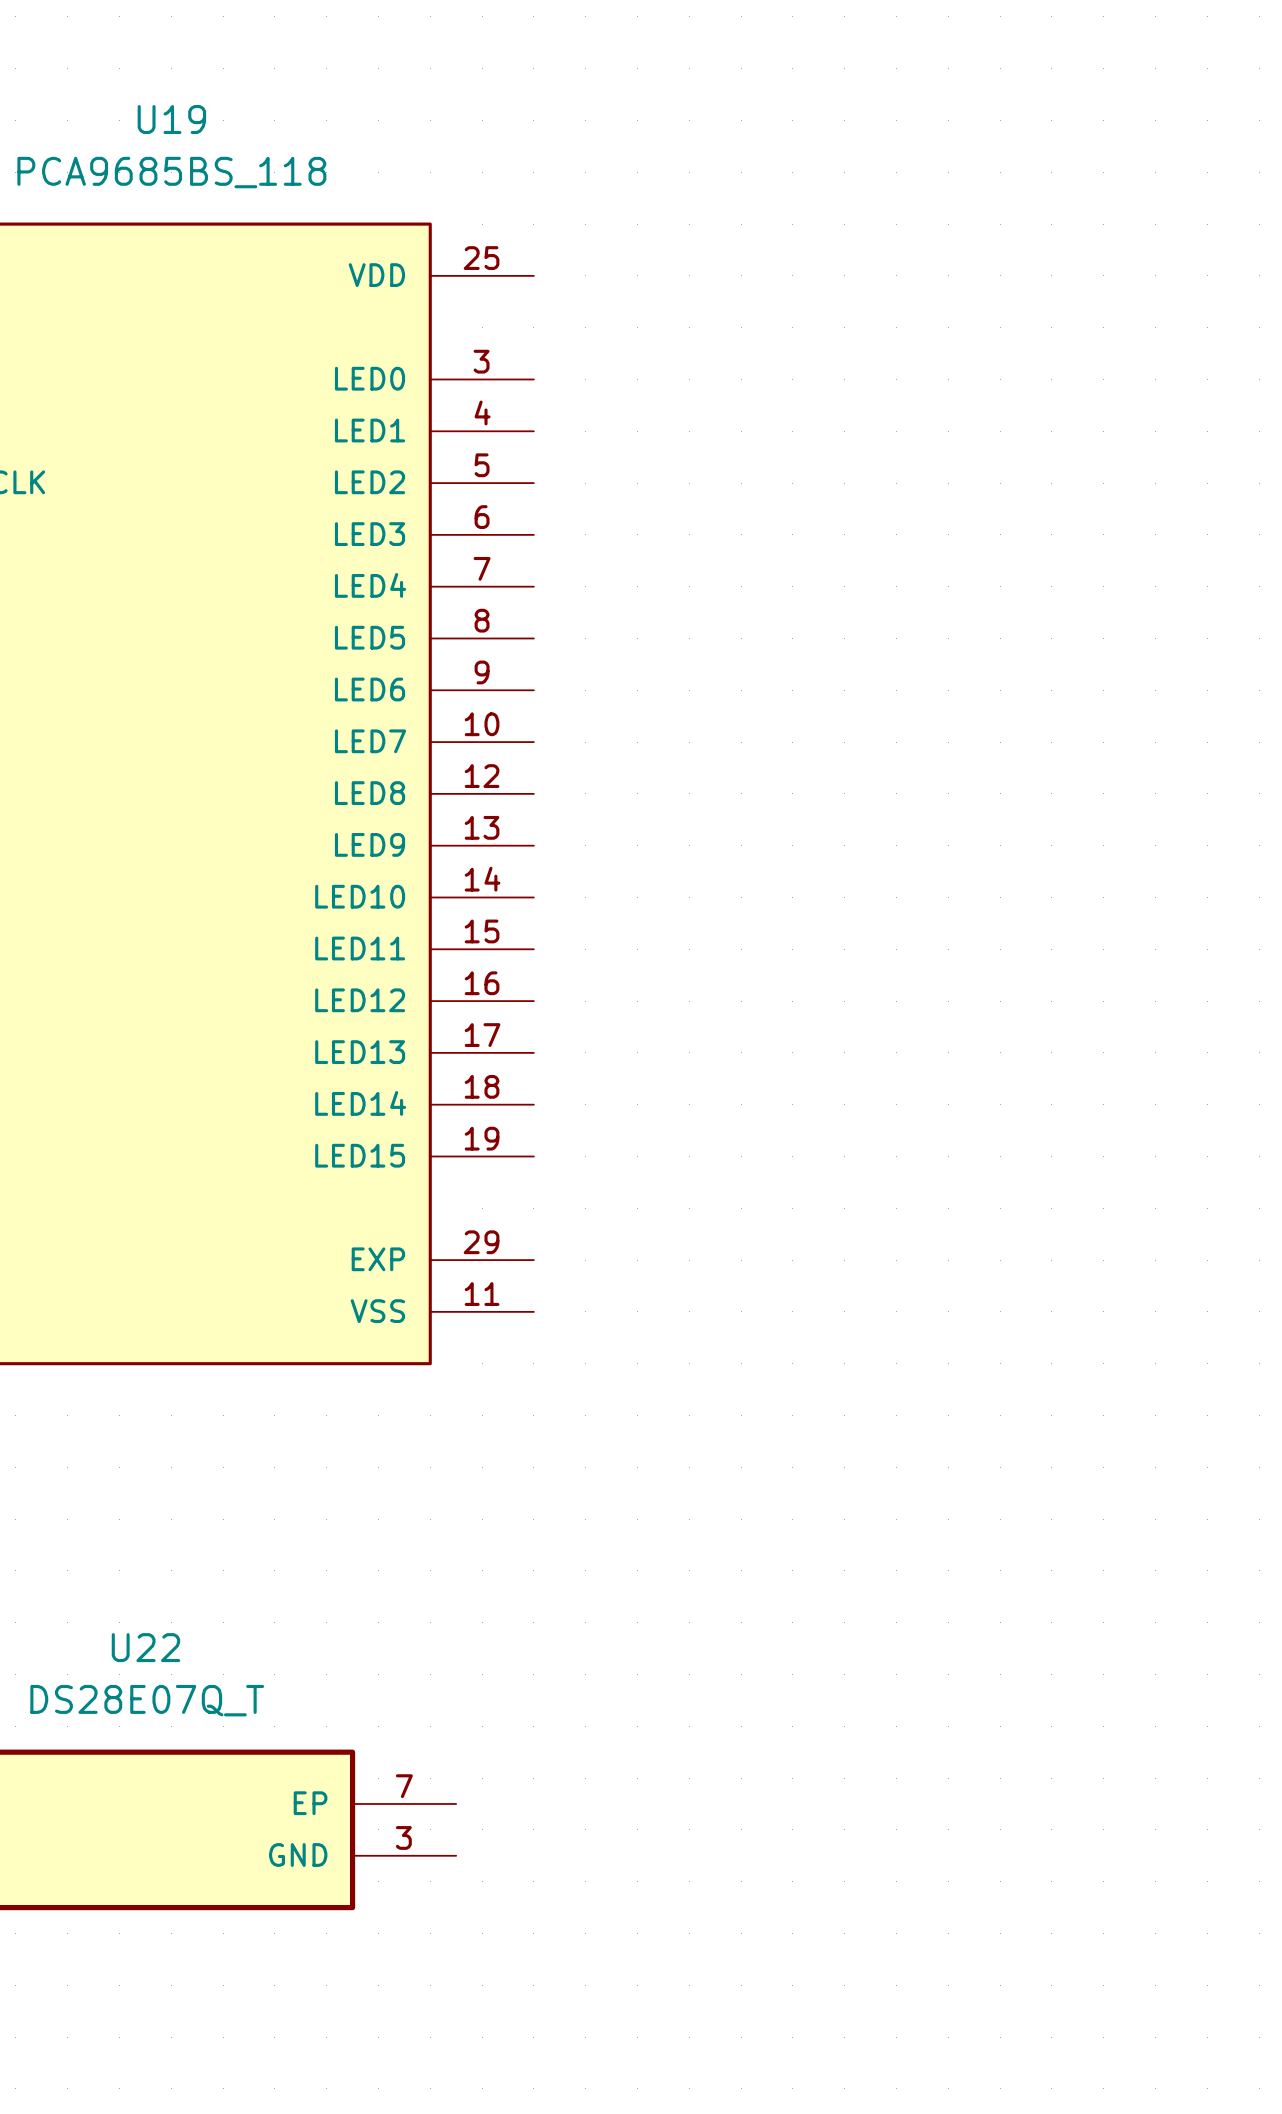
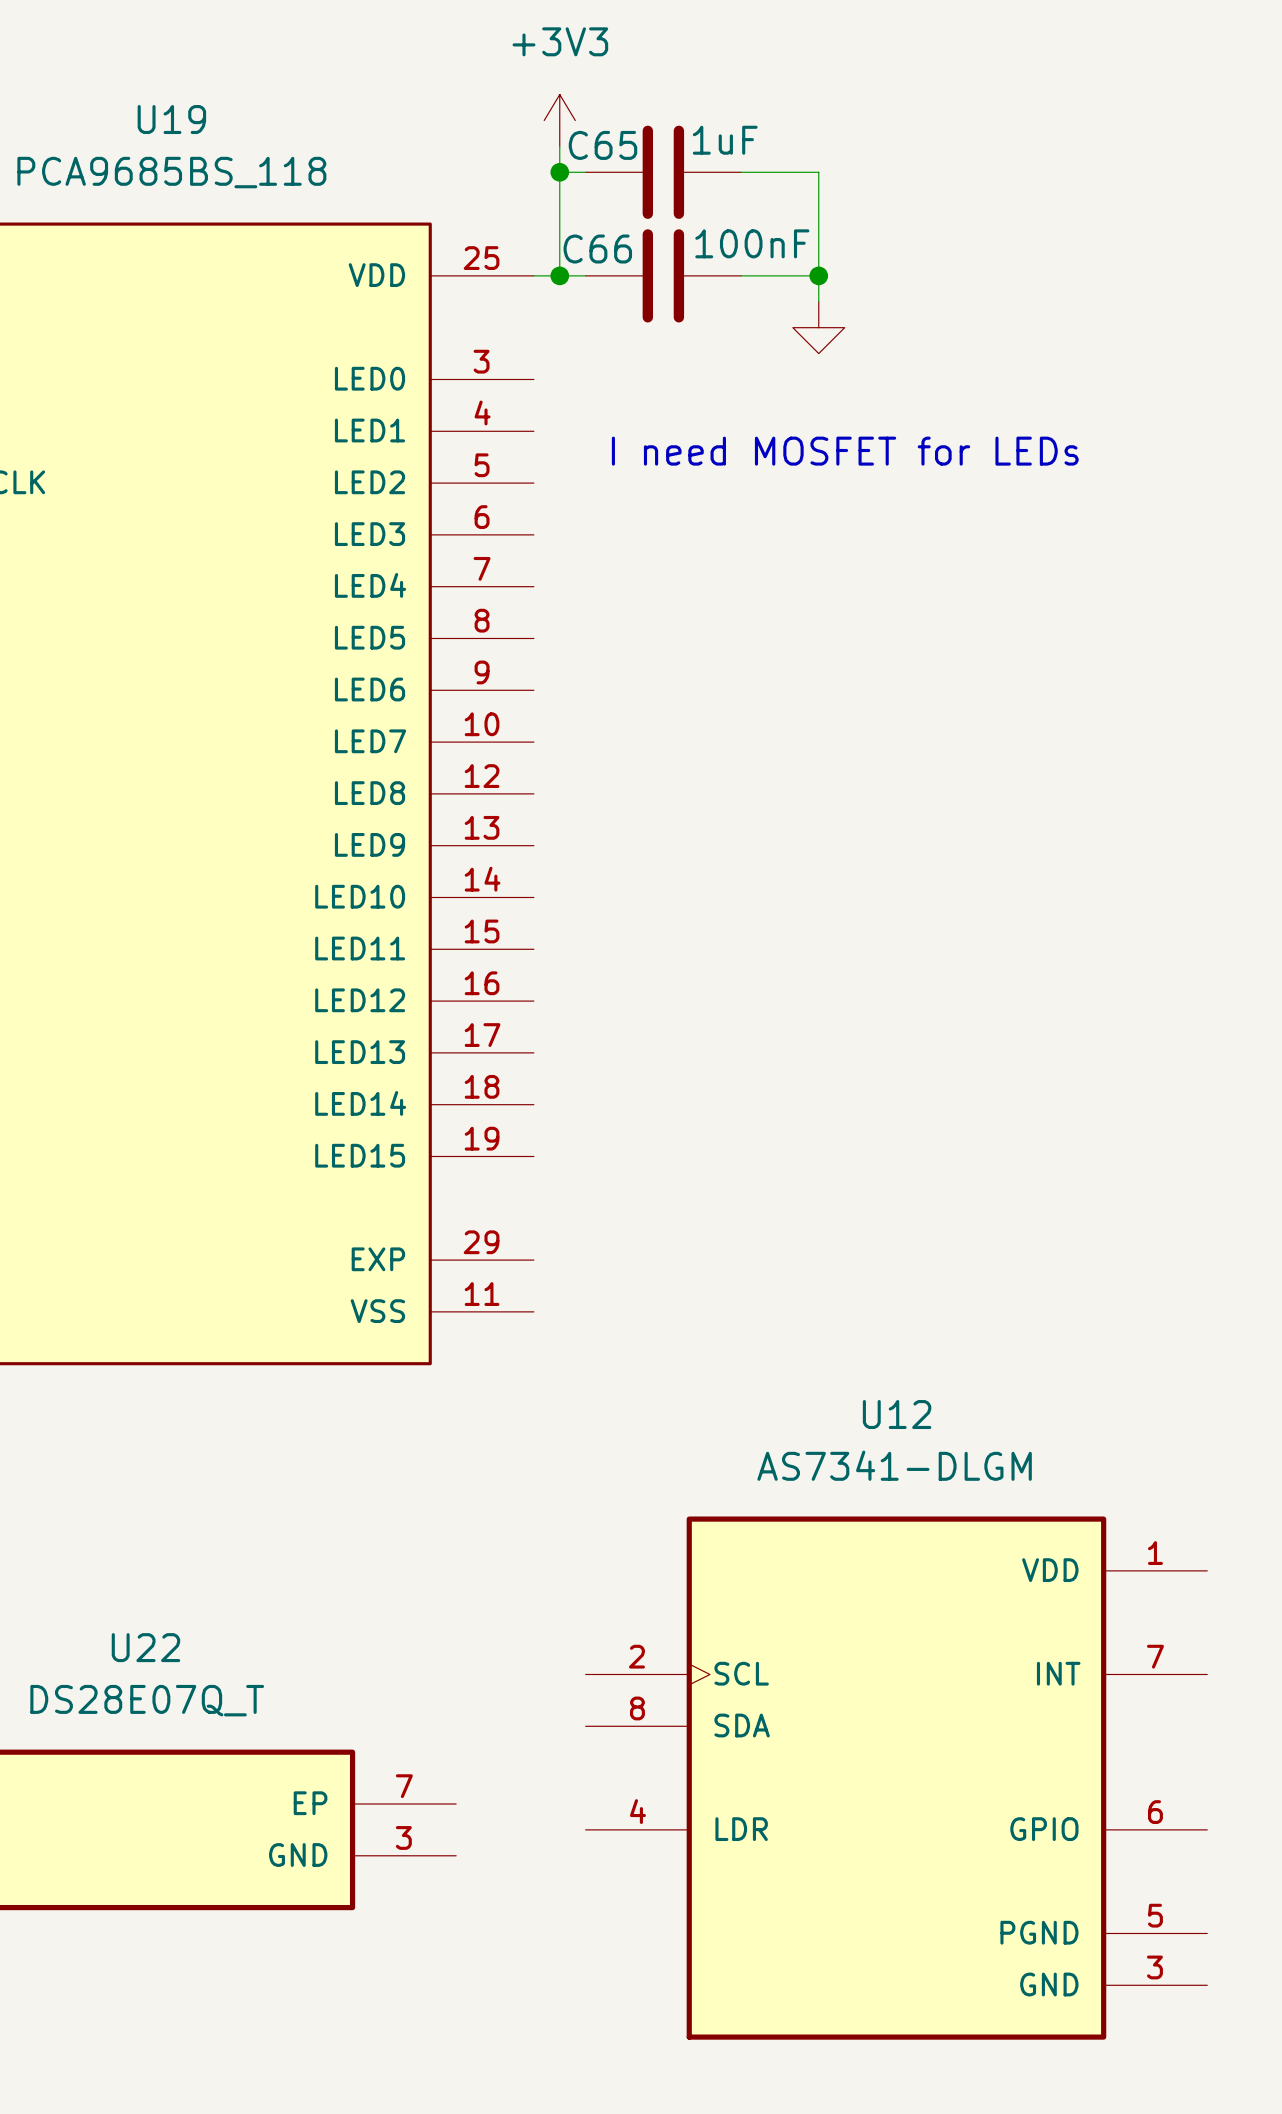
power symbol: none -> +3V3 (559, 120)
wire: none -> (559, 146) (559, 275)
wire: none -> (559, 172) (585, 172)
junction: none -> (559, 172)
C65: none -> 1uF (663, 172)
wire: none -> (741, 172) (818, 172) (818, 301)
wire: none -> (533, 275) (585, 275)
junction: none -> (559, 275)
C66: none -> 100nF (663, 275)
wire: none -> (741, 275) (818, 275)
junction: none -> (818, 275)
power symbol: none -> (818, 327)
text: none -> I need MOSFET for LEDs (845, 451)
U12: none -> AS7341-DLGM (896, 1778)

